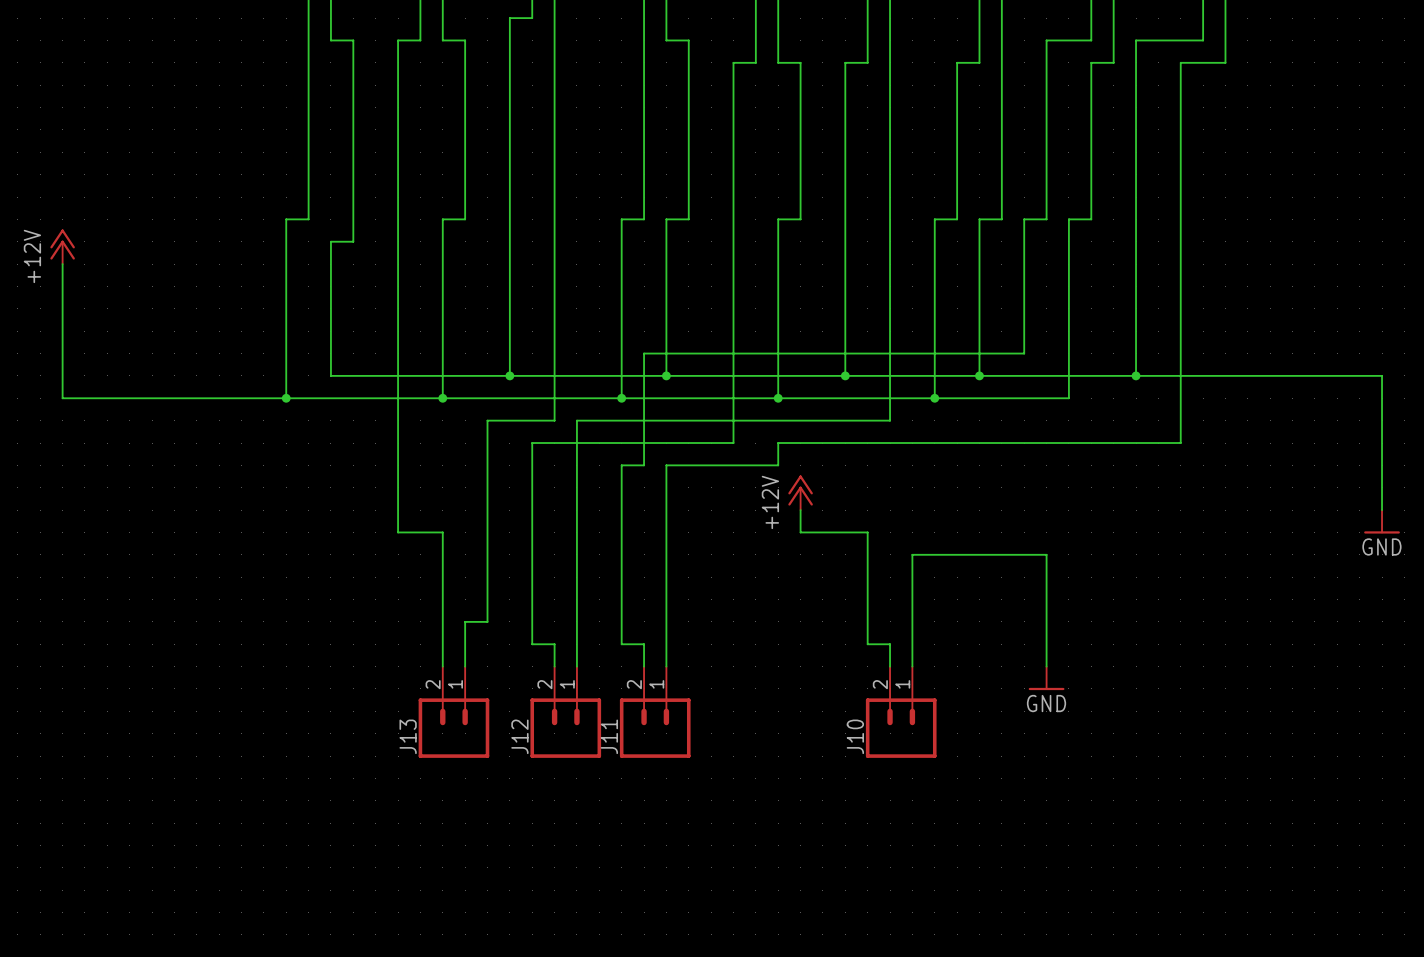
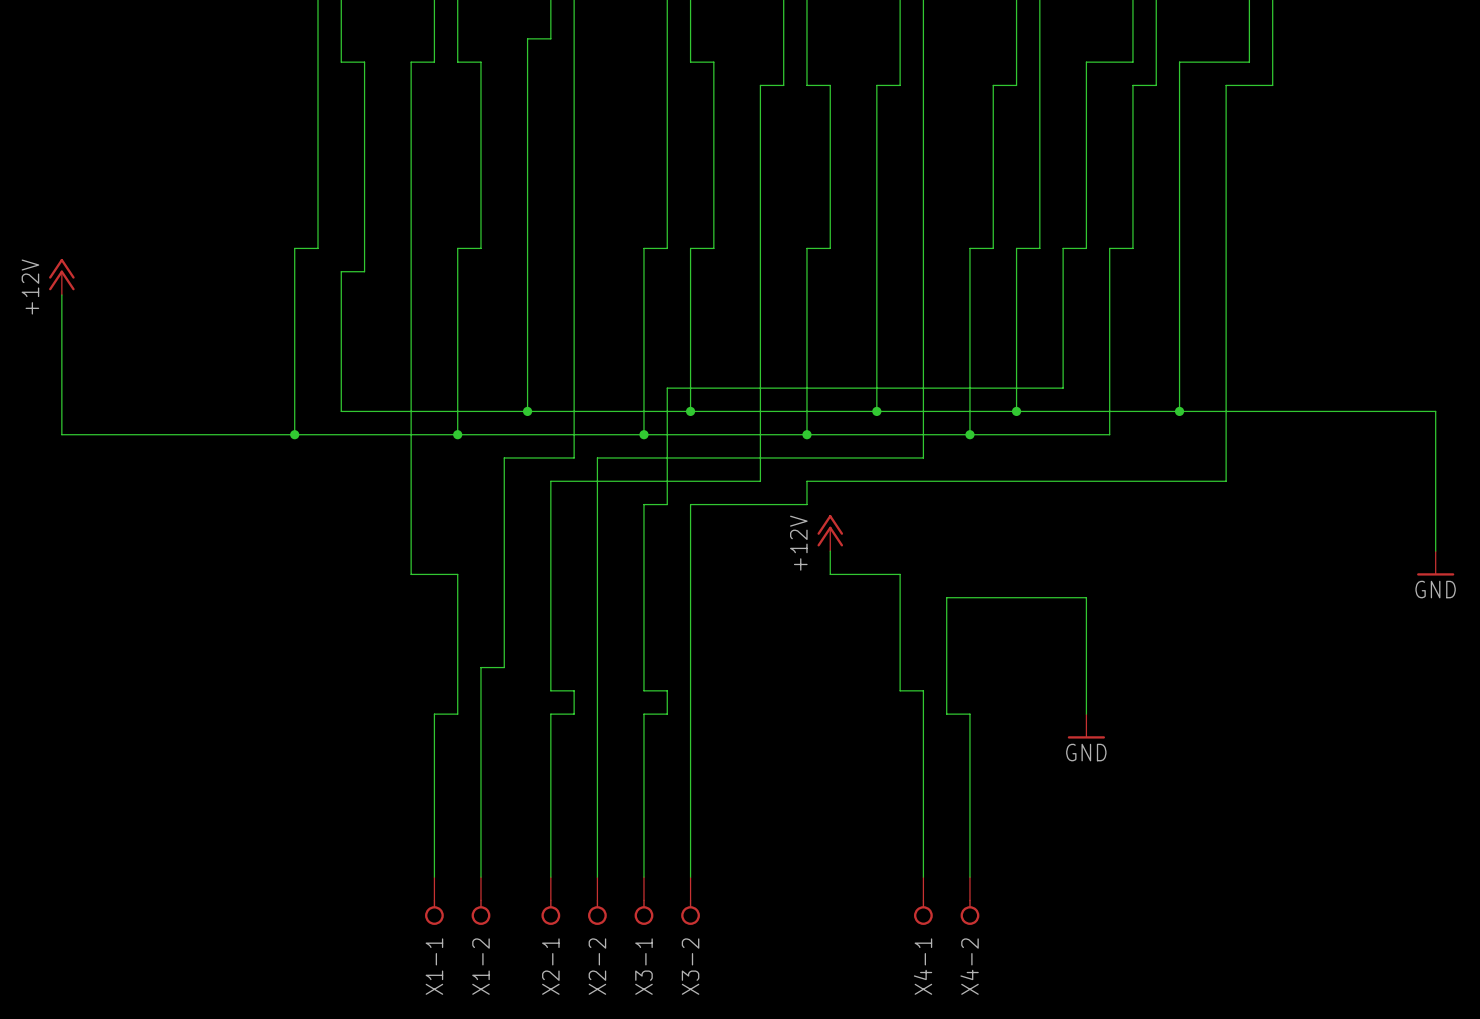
wire: none -> (457, 714) (434, 714) (434, 877)
wire: none -> (480, 714) (480, 877)
wire: none -> (574, 714) (550, 714) (550, 877)
wire: none -> (597, 714) (597, 877)
wire: none -> (667, 714) (643, 714) (643, 877)
wire: none -> (690, 714) (690, 877)
wire: none -> (923, 714) (923, 877)
wire: none -> (946, 714) (969, 714) (969, 877)
J13: (453, 712) -> none
J12: (565, 712) -> none
J11: (655, 712) -> none
J10: (901, 712) -> none
X1-1: none -> (434, 901)
X1-2: none -> (480, 901)
X2-1: none -> (550, 901)
X2-2: none -> (597, 901)
X3-1: none -> (643, 901)
X3-2: none -> (690, 901)
X4-1: none -> (923, 901)
X4-2: none -> (969, 901)

